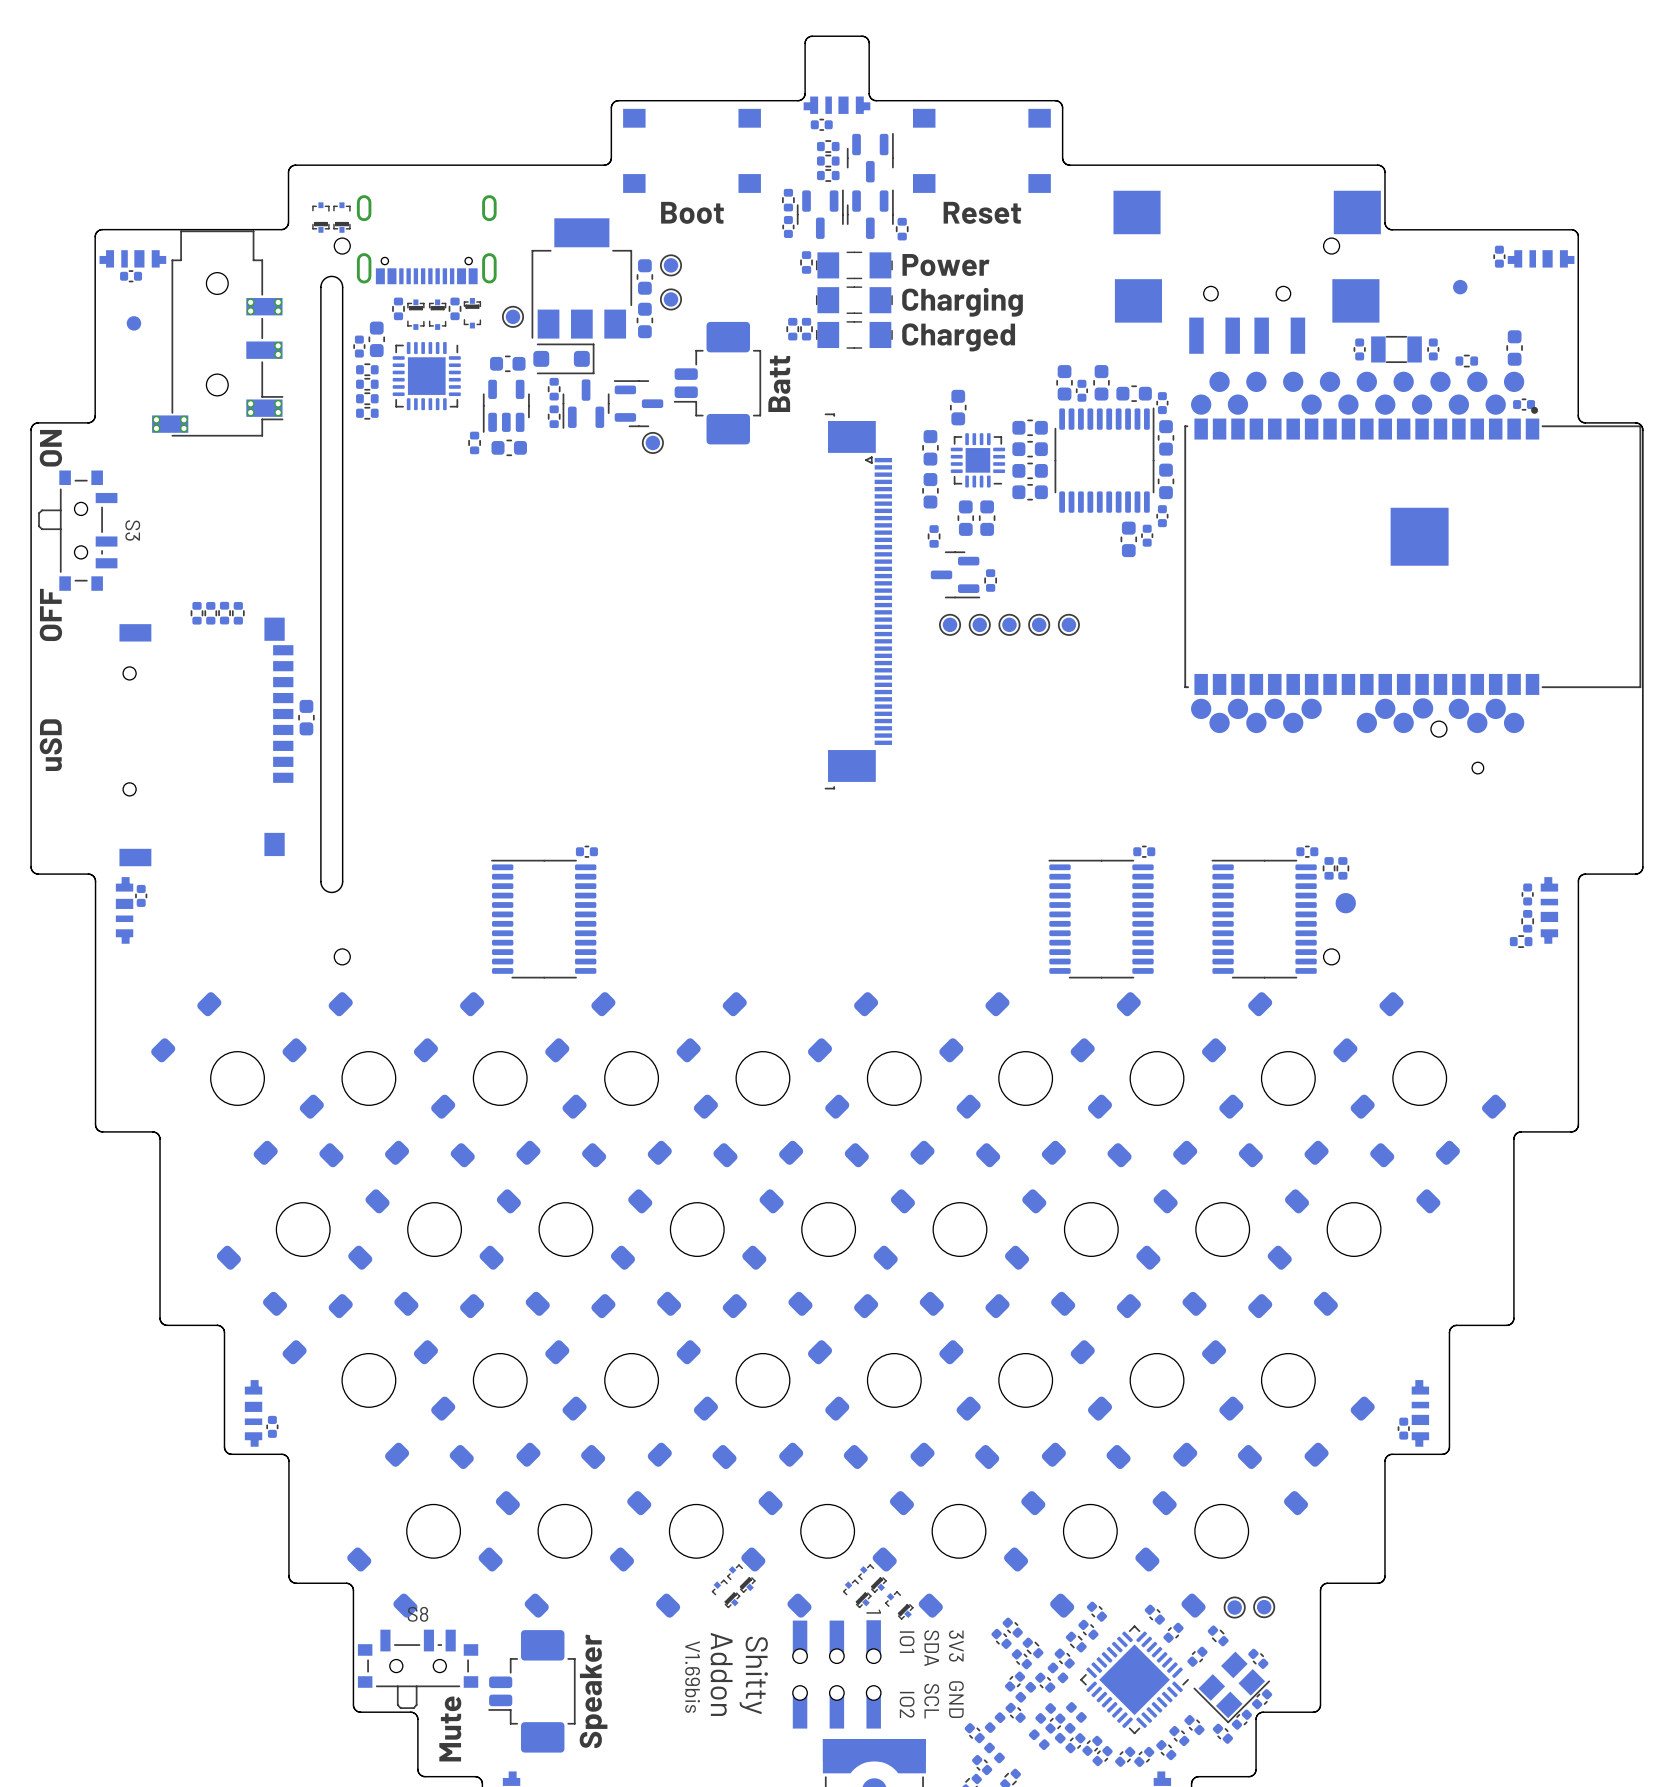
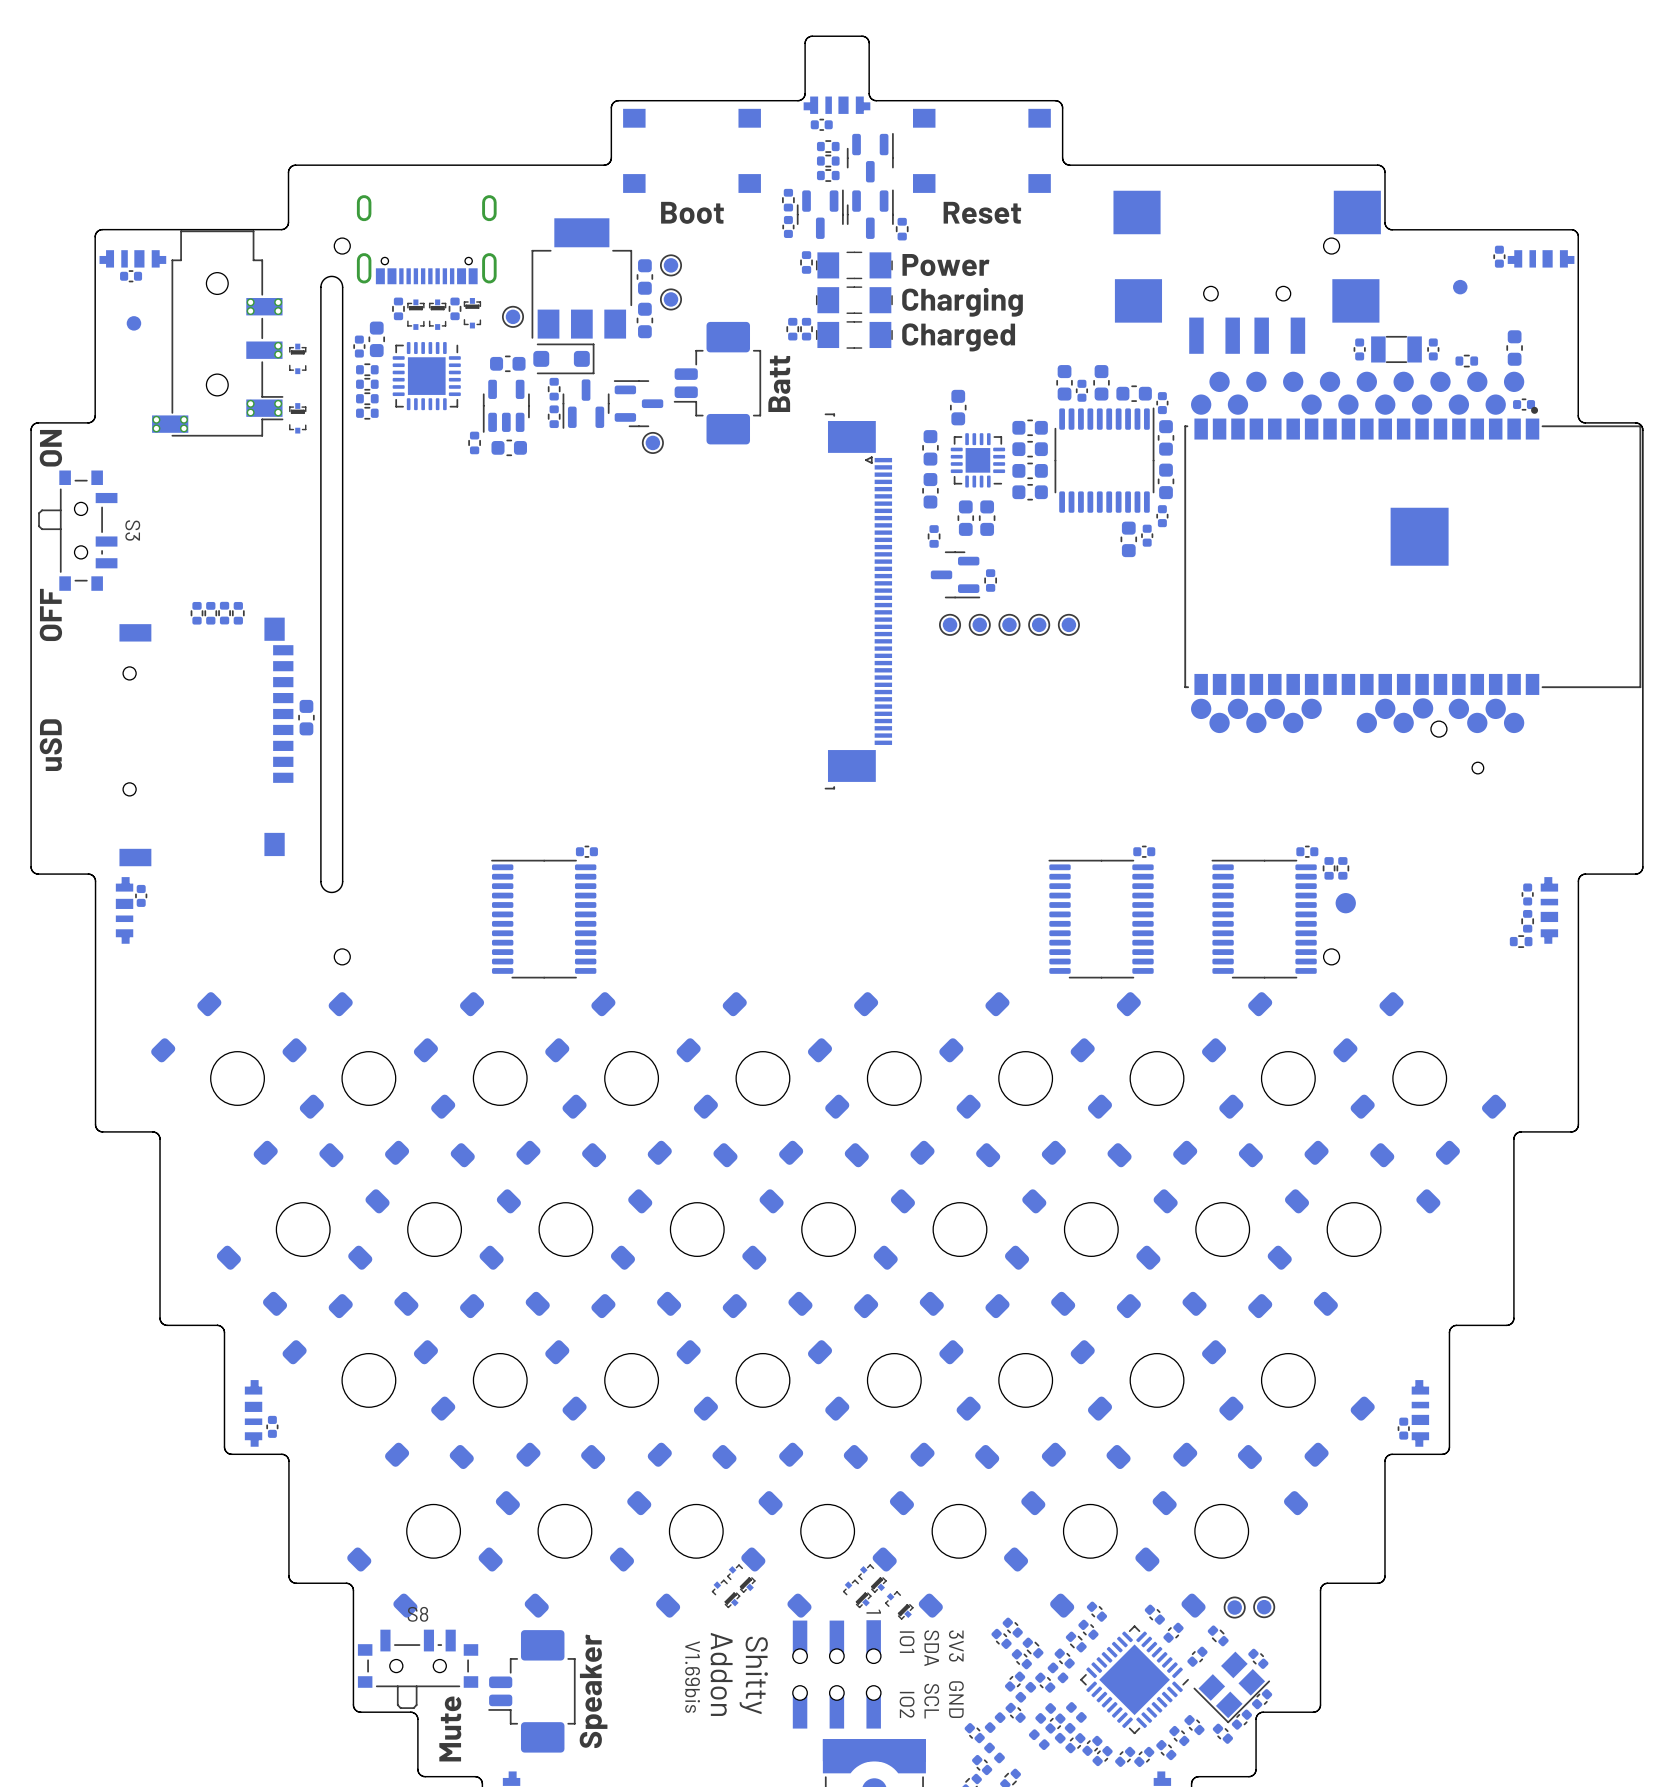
part: (320, 217) -> none
part: (341, 217) -> none
part: none -> (297, 358)
part: none -> (297, 418)

